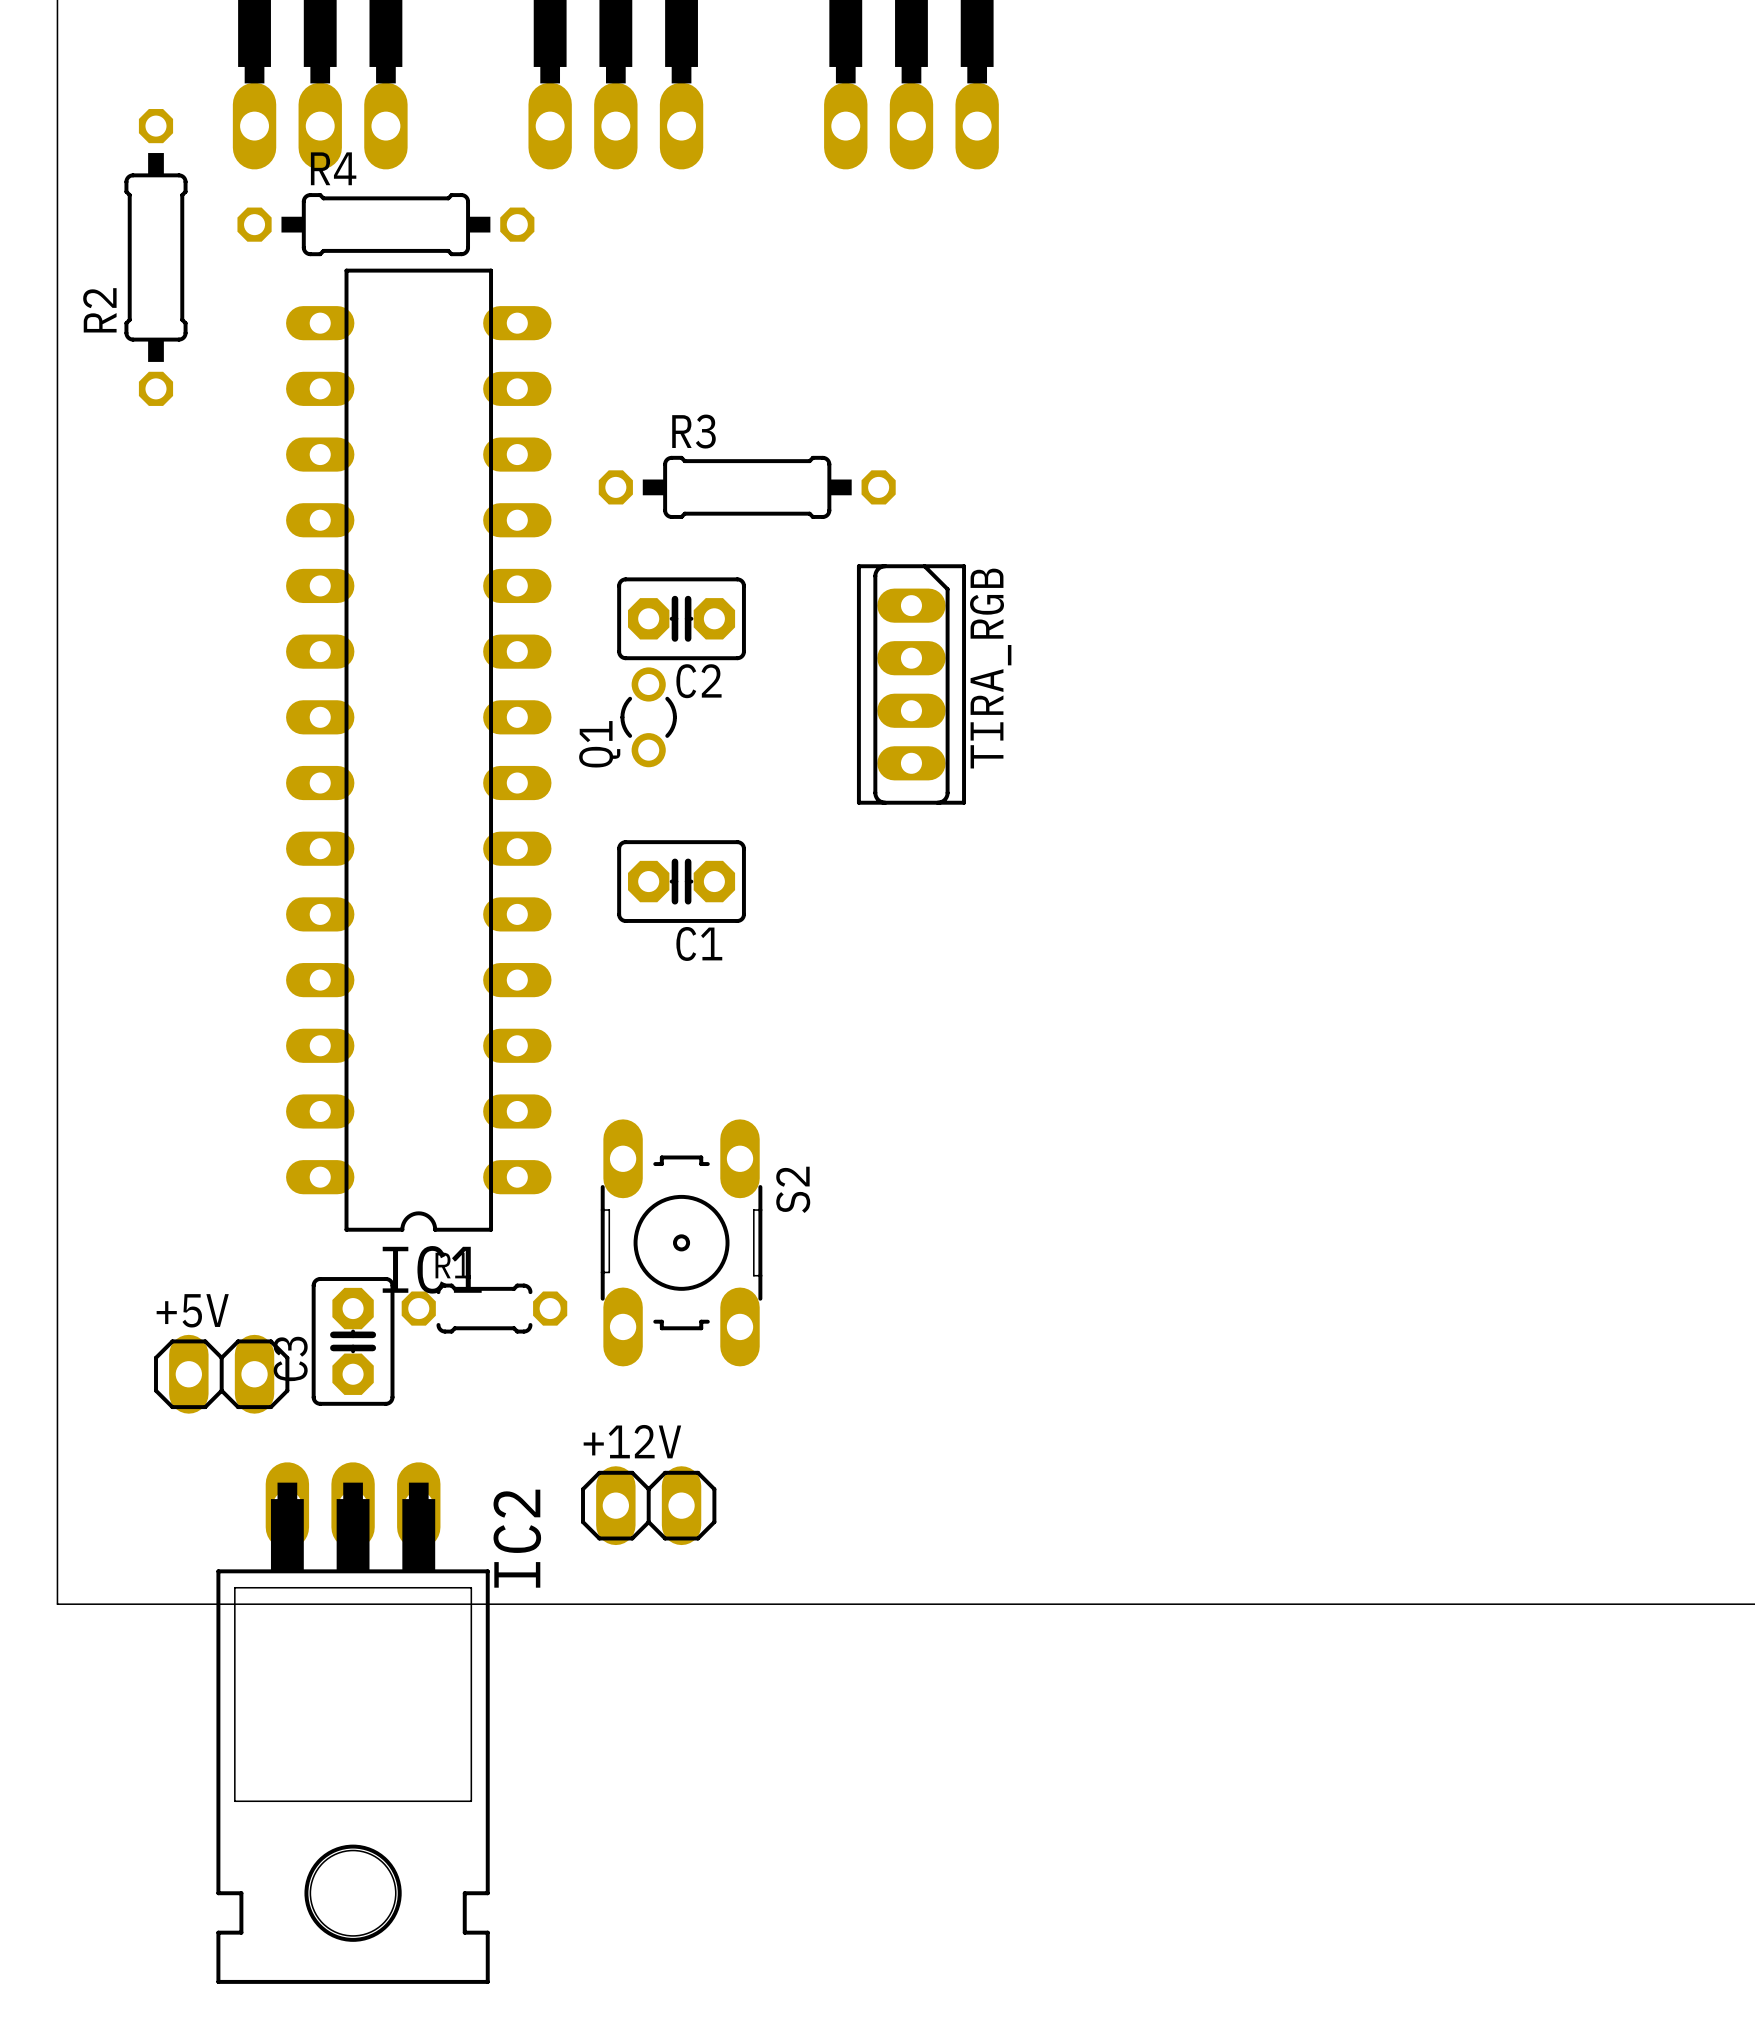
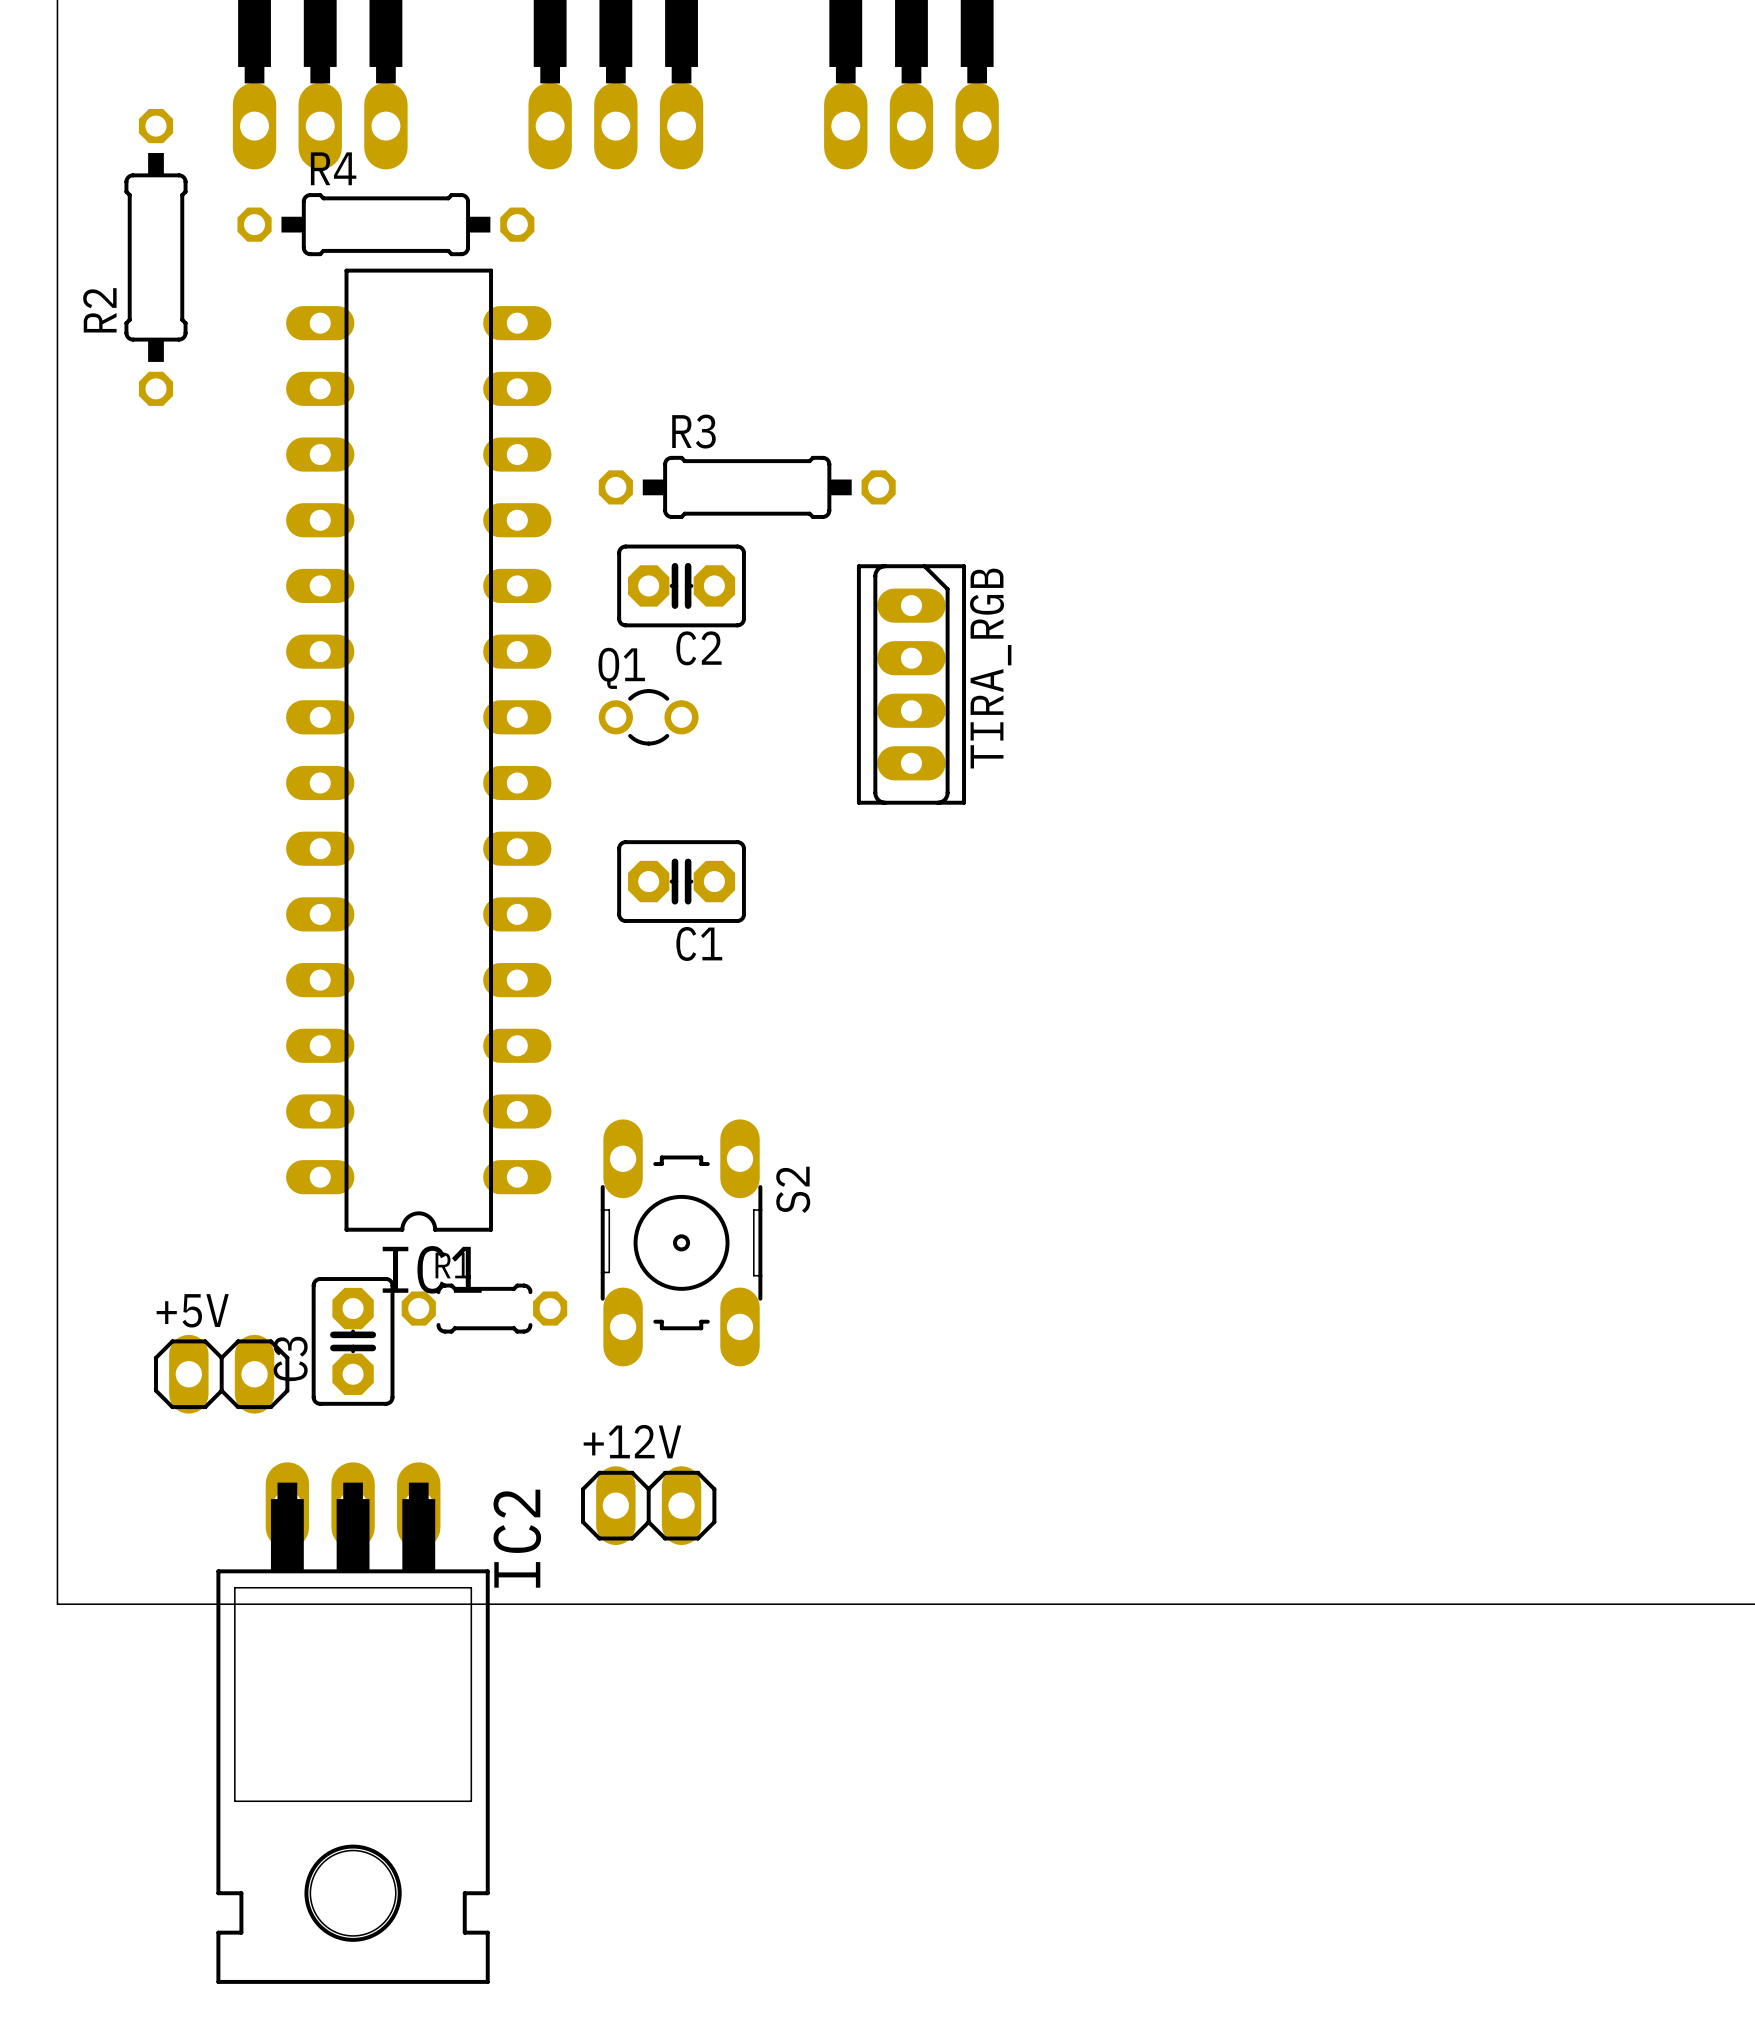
C2 position: (681, 618) -> (681, 585)
Q1 rotation: 0° (648, 717) -> 90° clockwise (648, 717)

